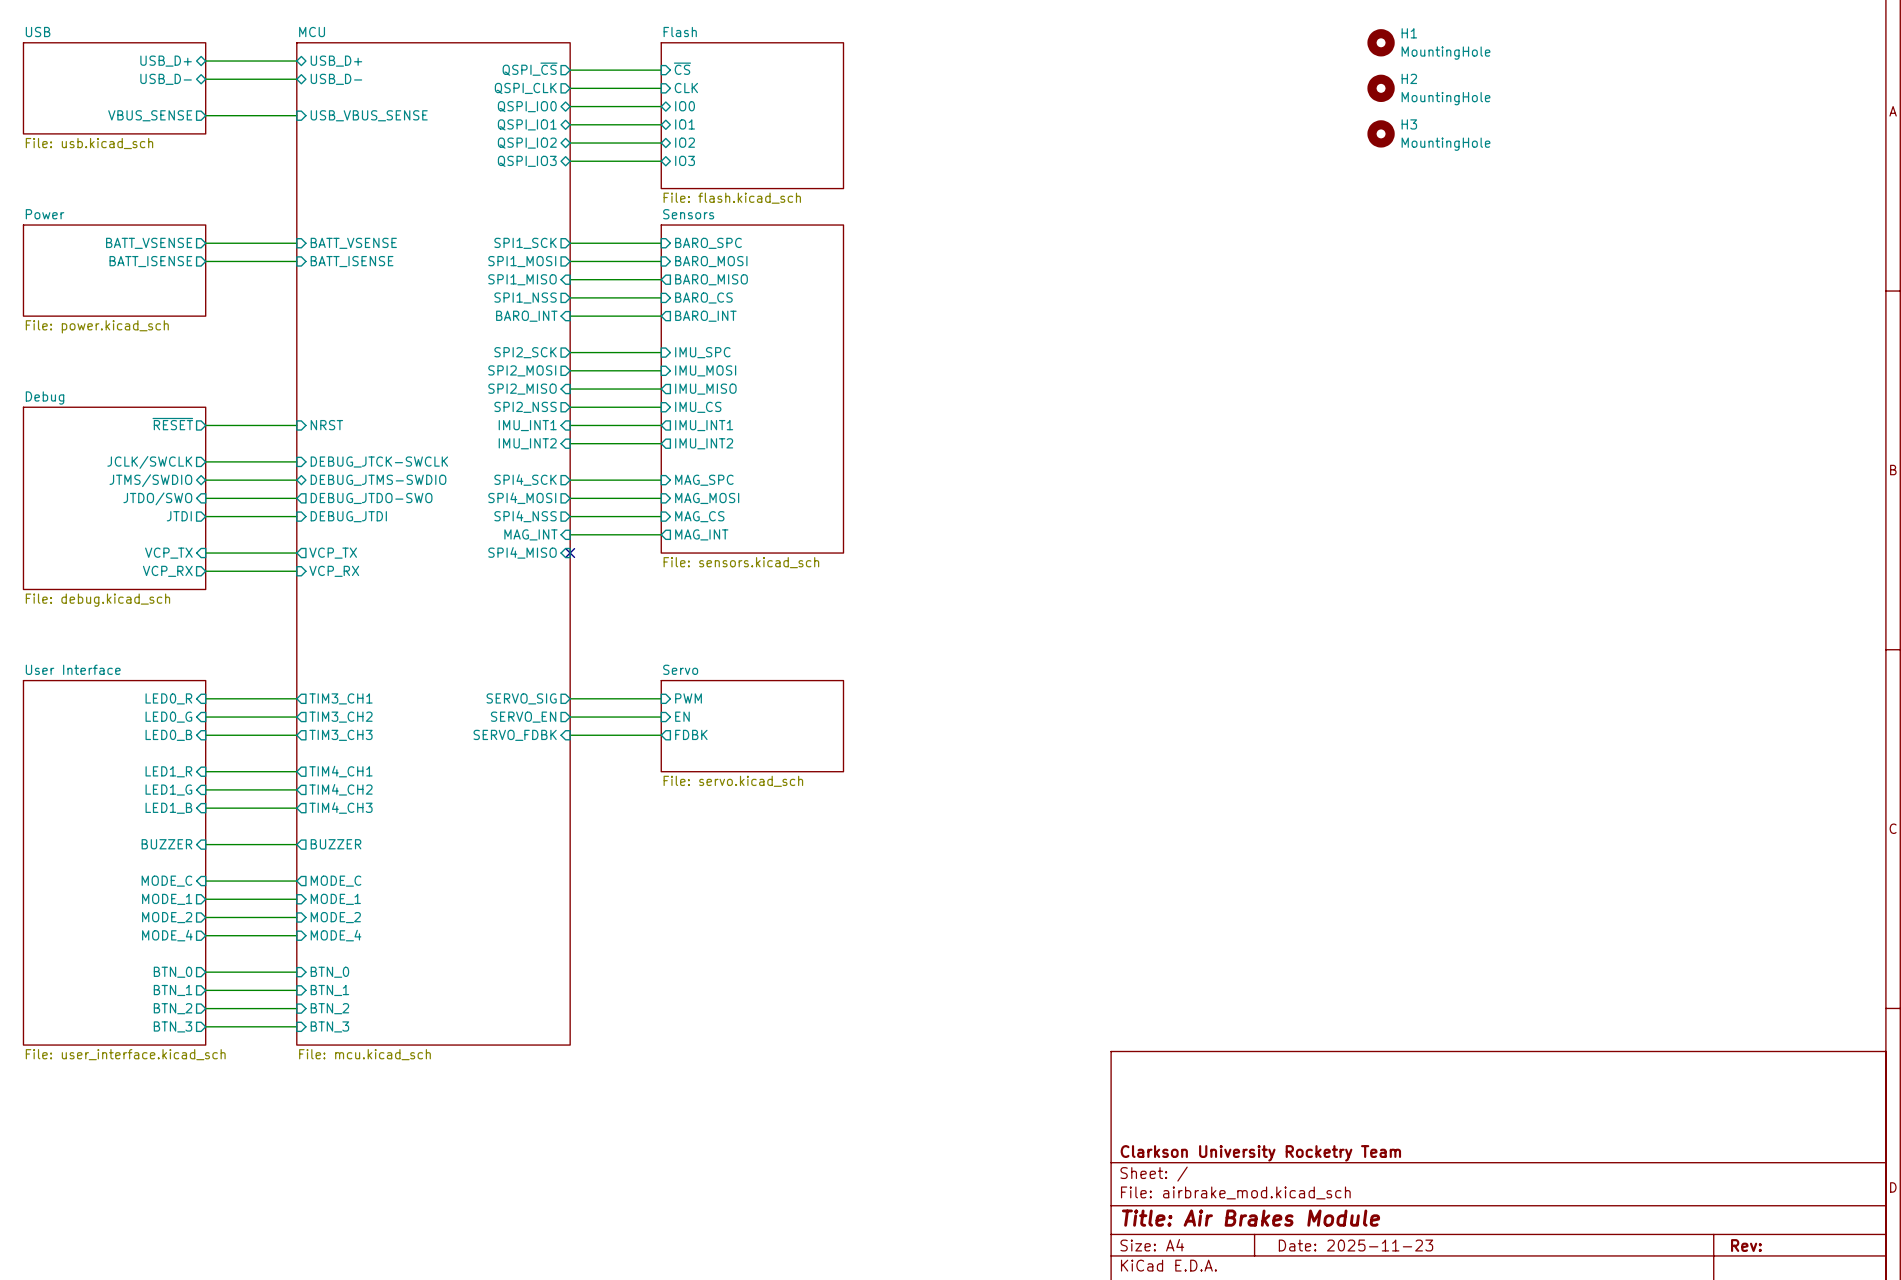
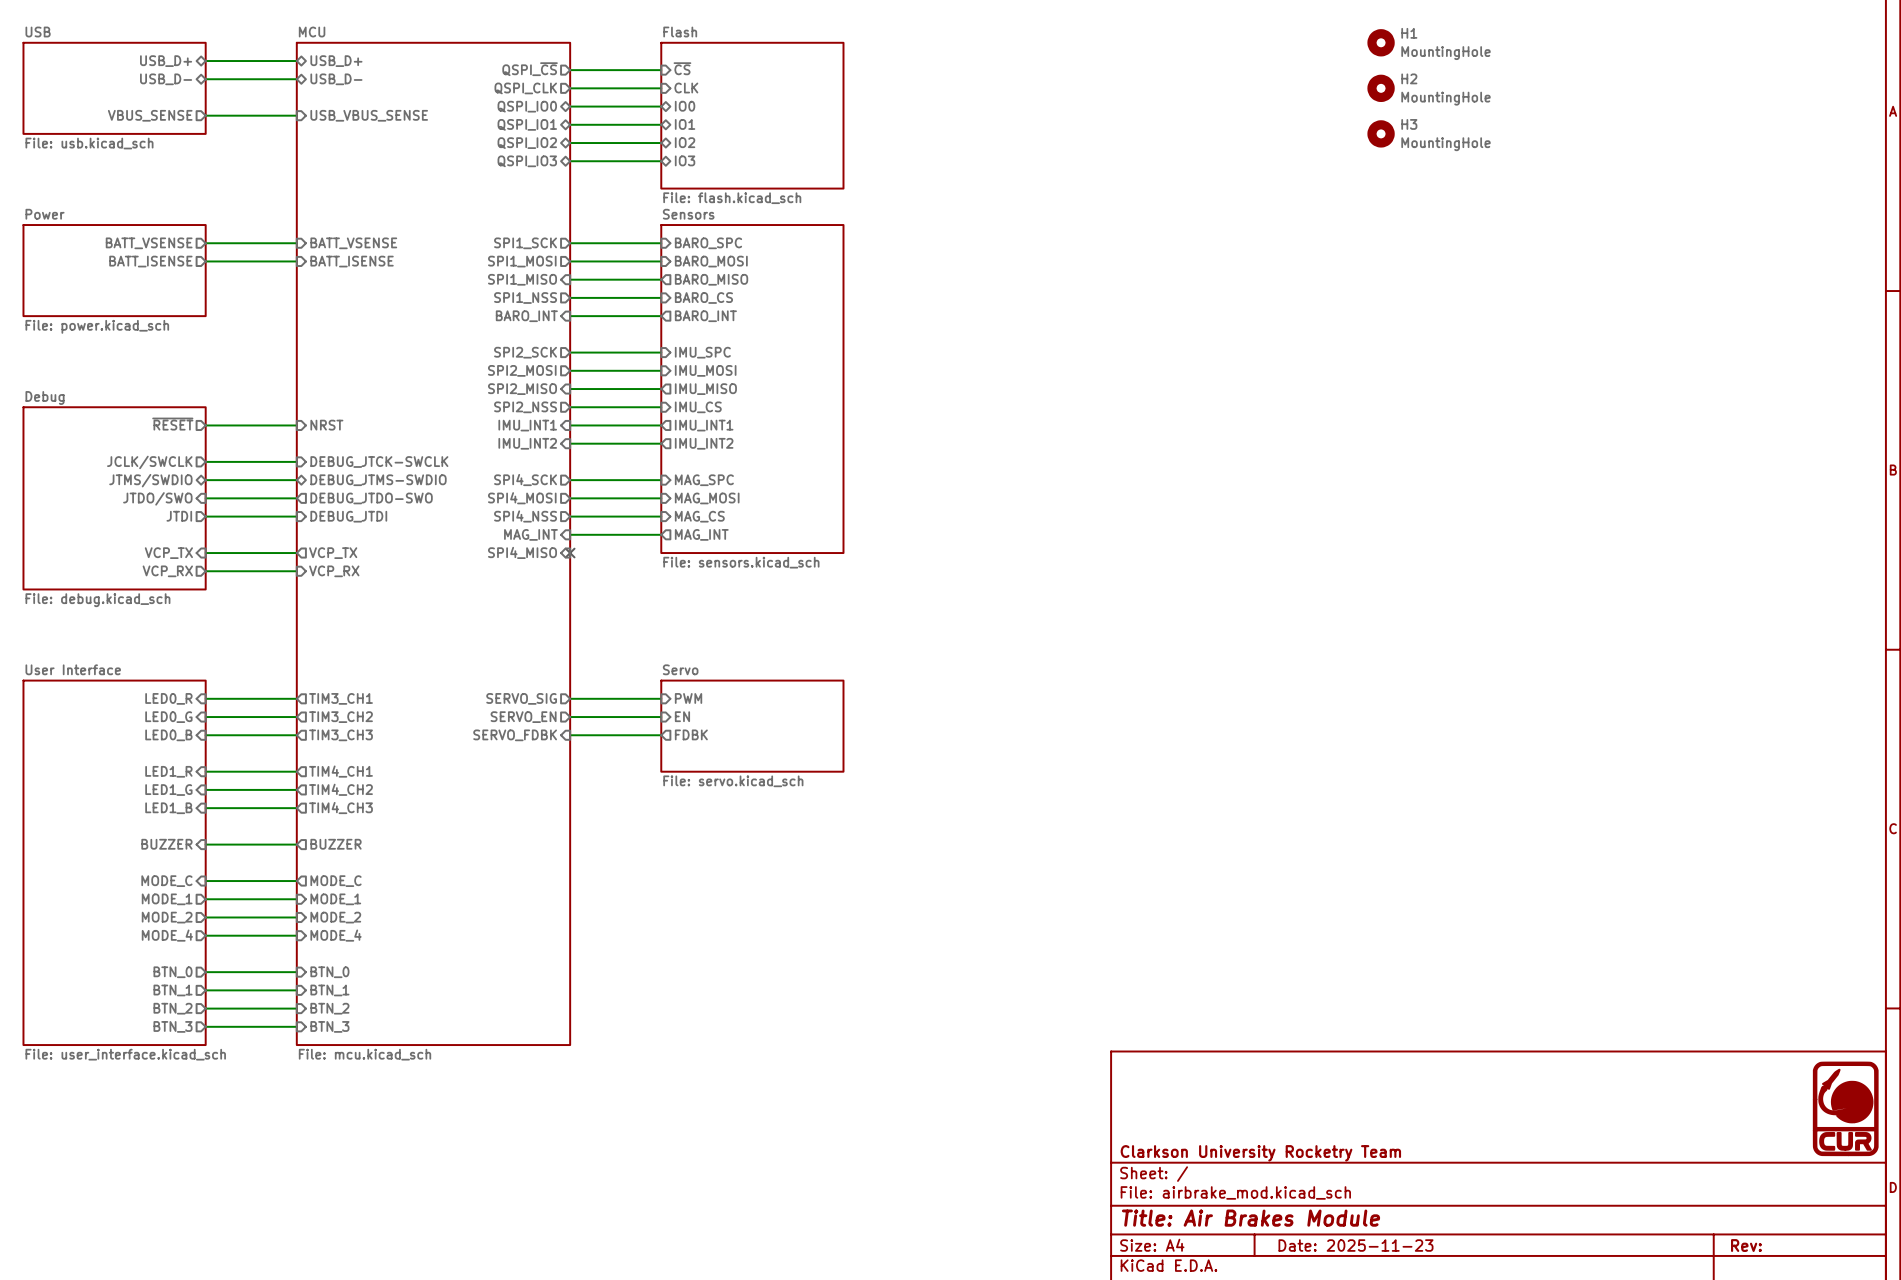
power symbol: none -> (1845, 1108)

